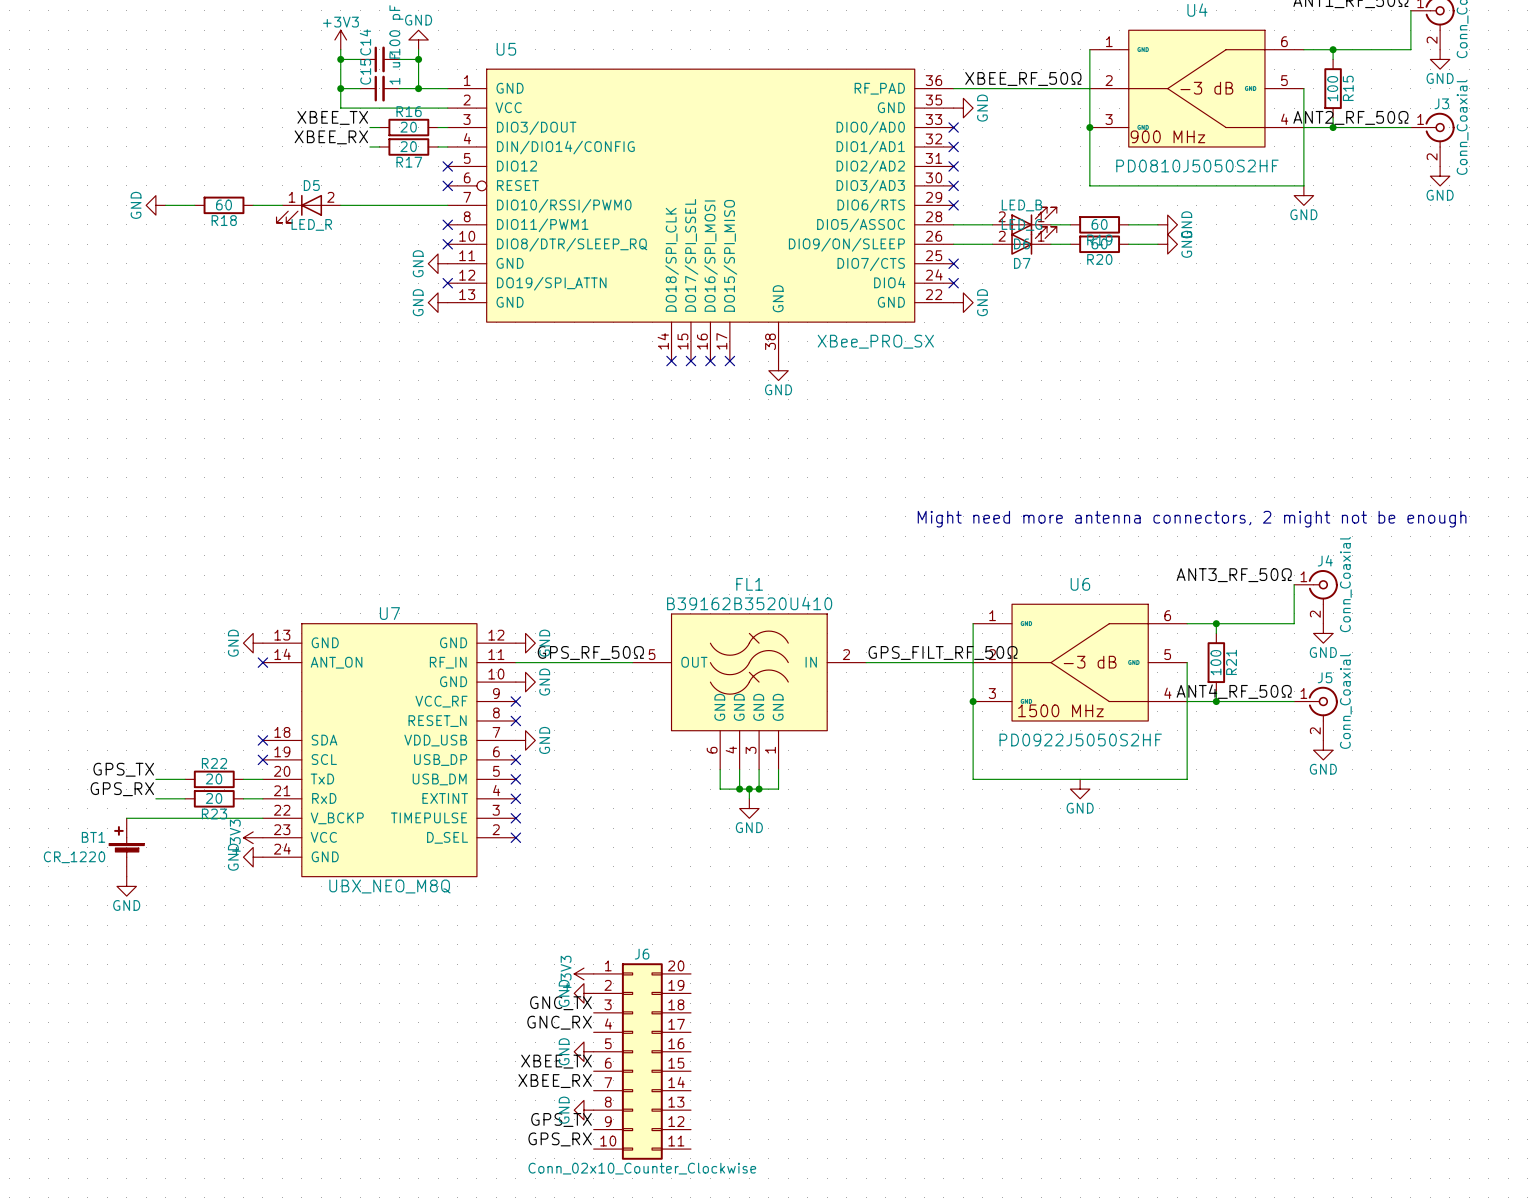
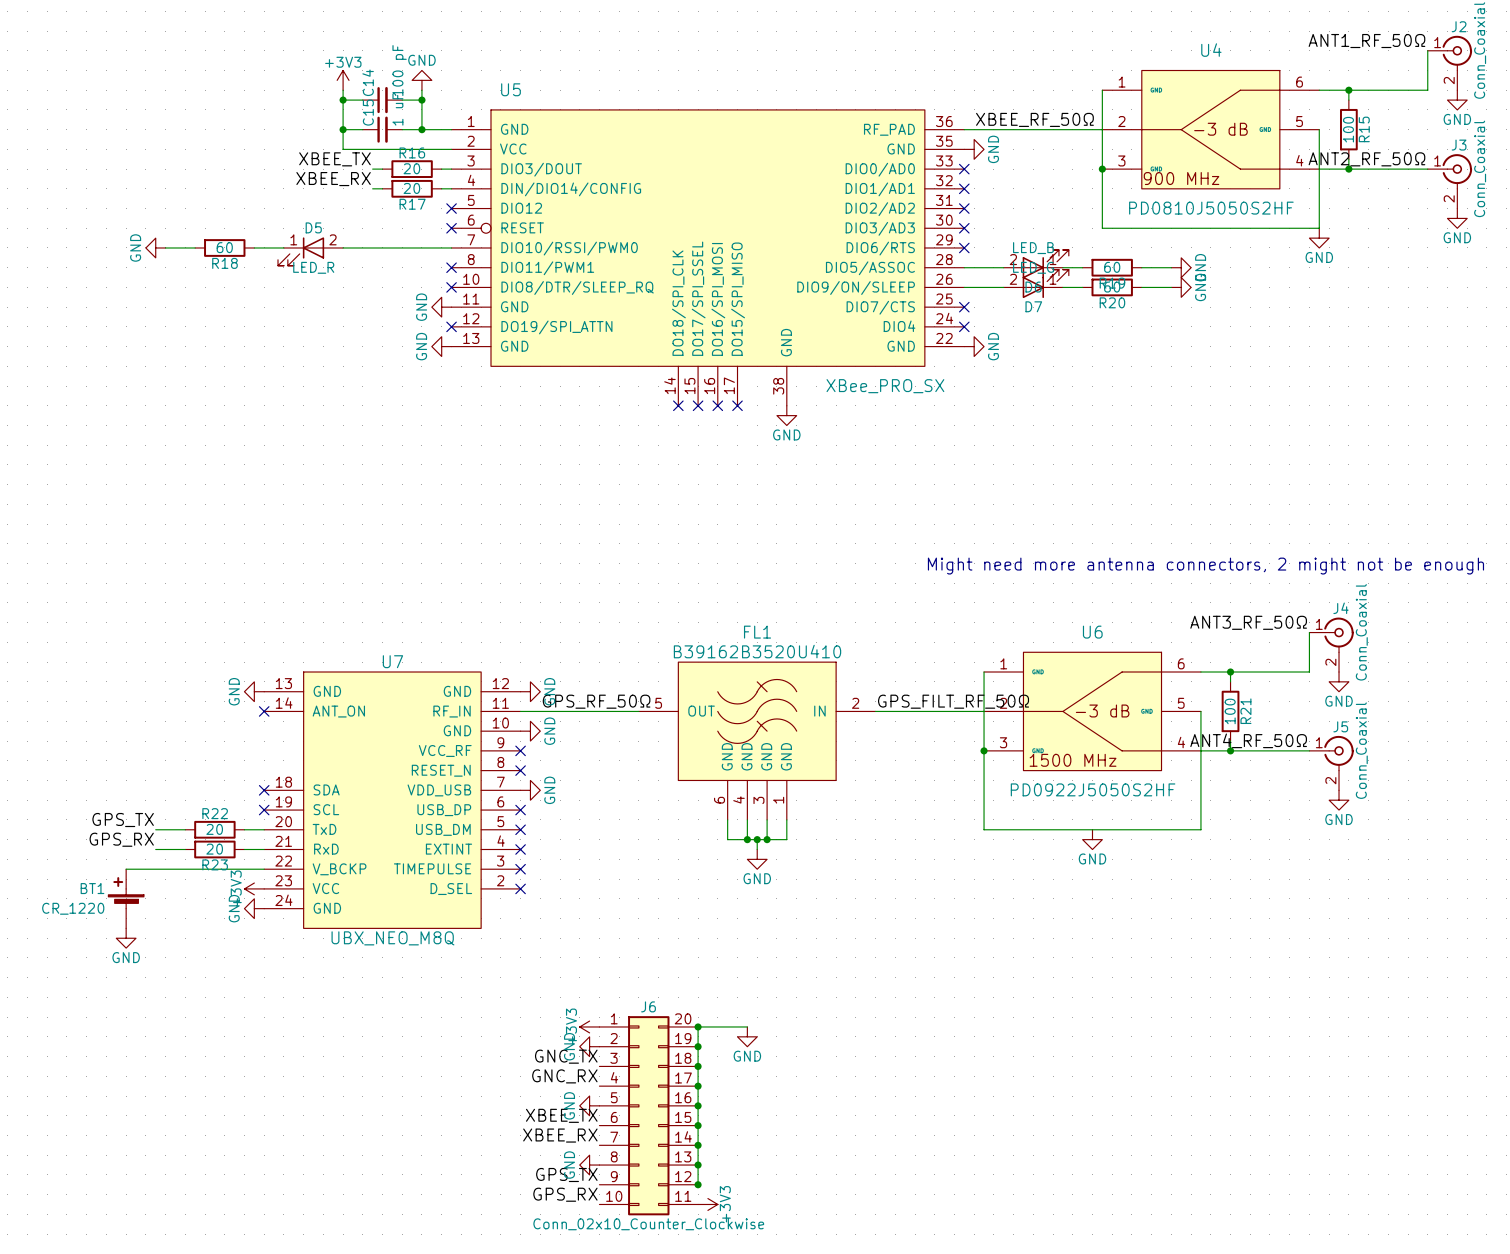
junction: none -> (698, 1026)
wire: none -> (747, 1026) (698, 1026) (698, 1184)
power symbol: none -> GND (747, 1036)
junction: none -> (698, 1046)
junction: none -> (698, 1066)
junction: none -> (698, 1086)
junction: none -> (698, 1105)
junction: none -> (698, 1125)
junction: none -> (698, 1145)
junction: none -> (698, 1165)
junction: none -> (698, 1184)
power symbol: none -> +3V3 (707, 1204)

